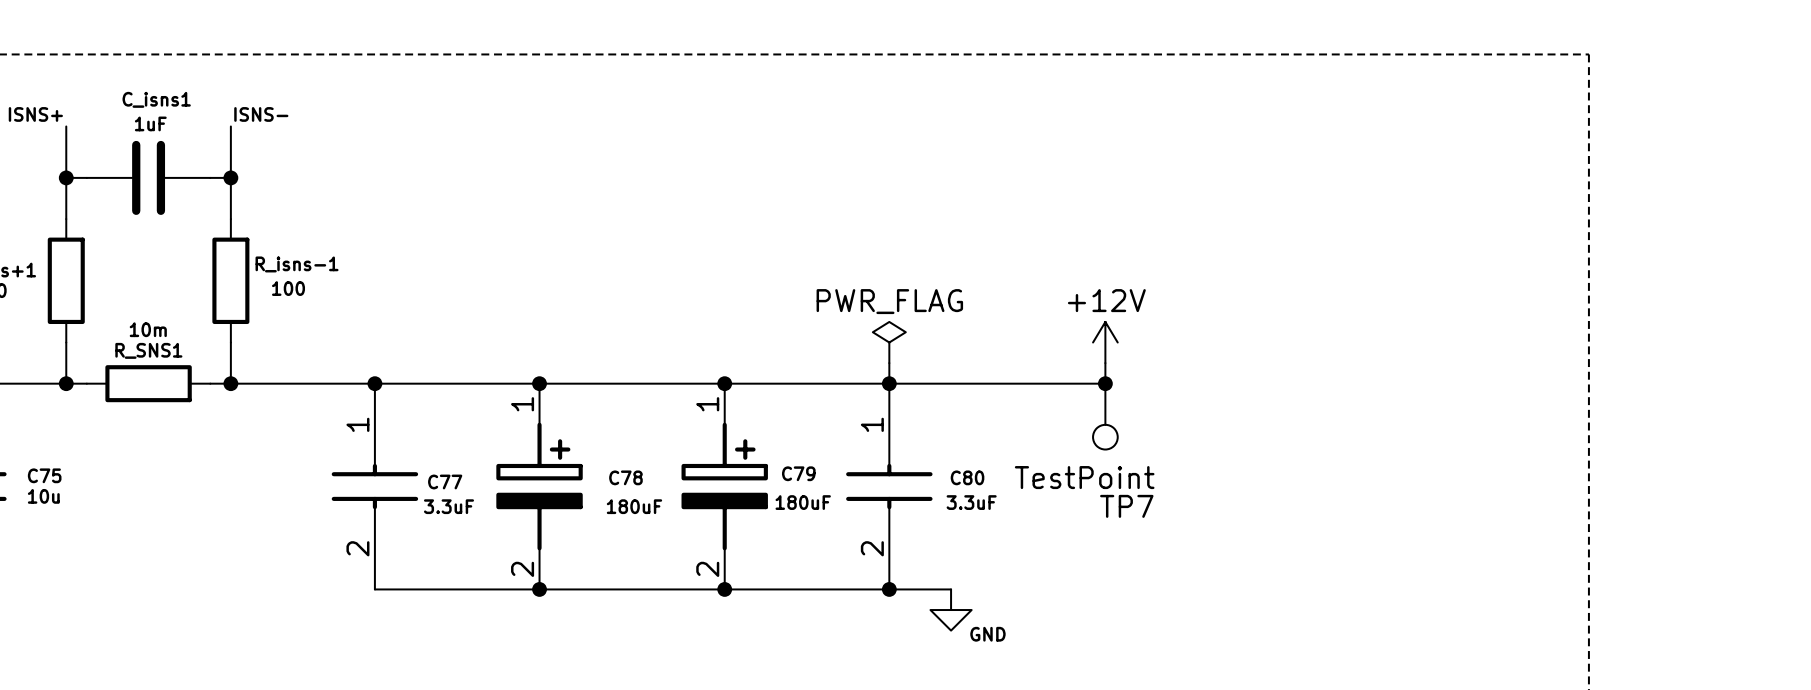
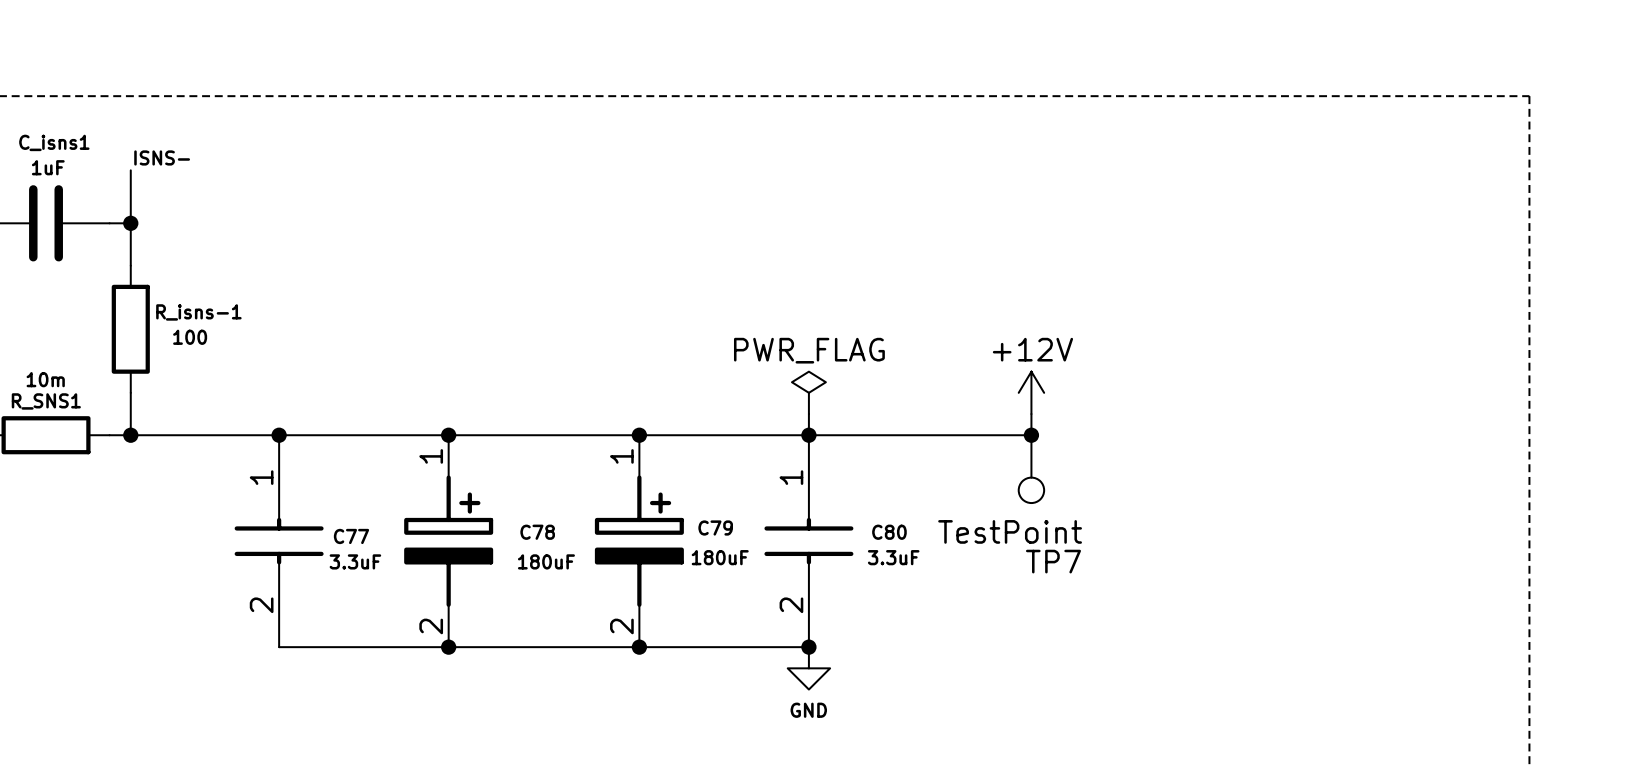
wire: (889, 589) (951, 589) -> none
power symbol position: GND (951, 610) -> GND (808, 668)
power symbol text position: GND (987, 634) -> GND (808, 710)

